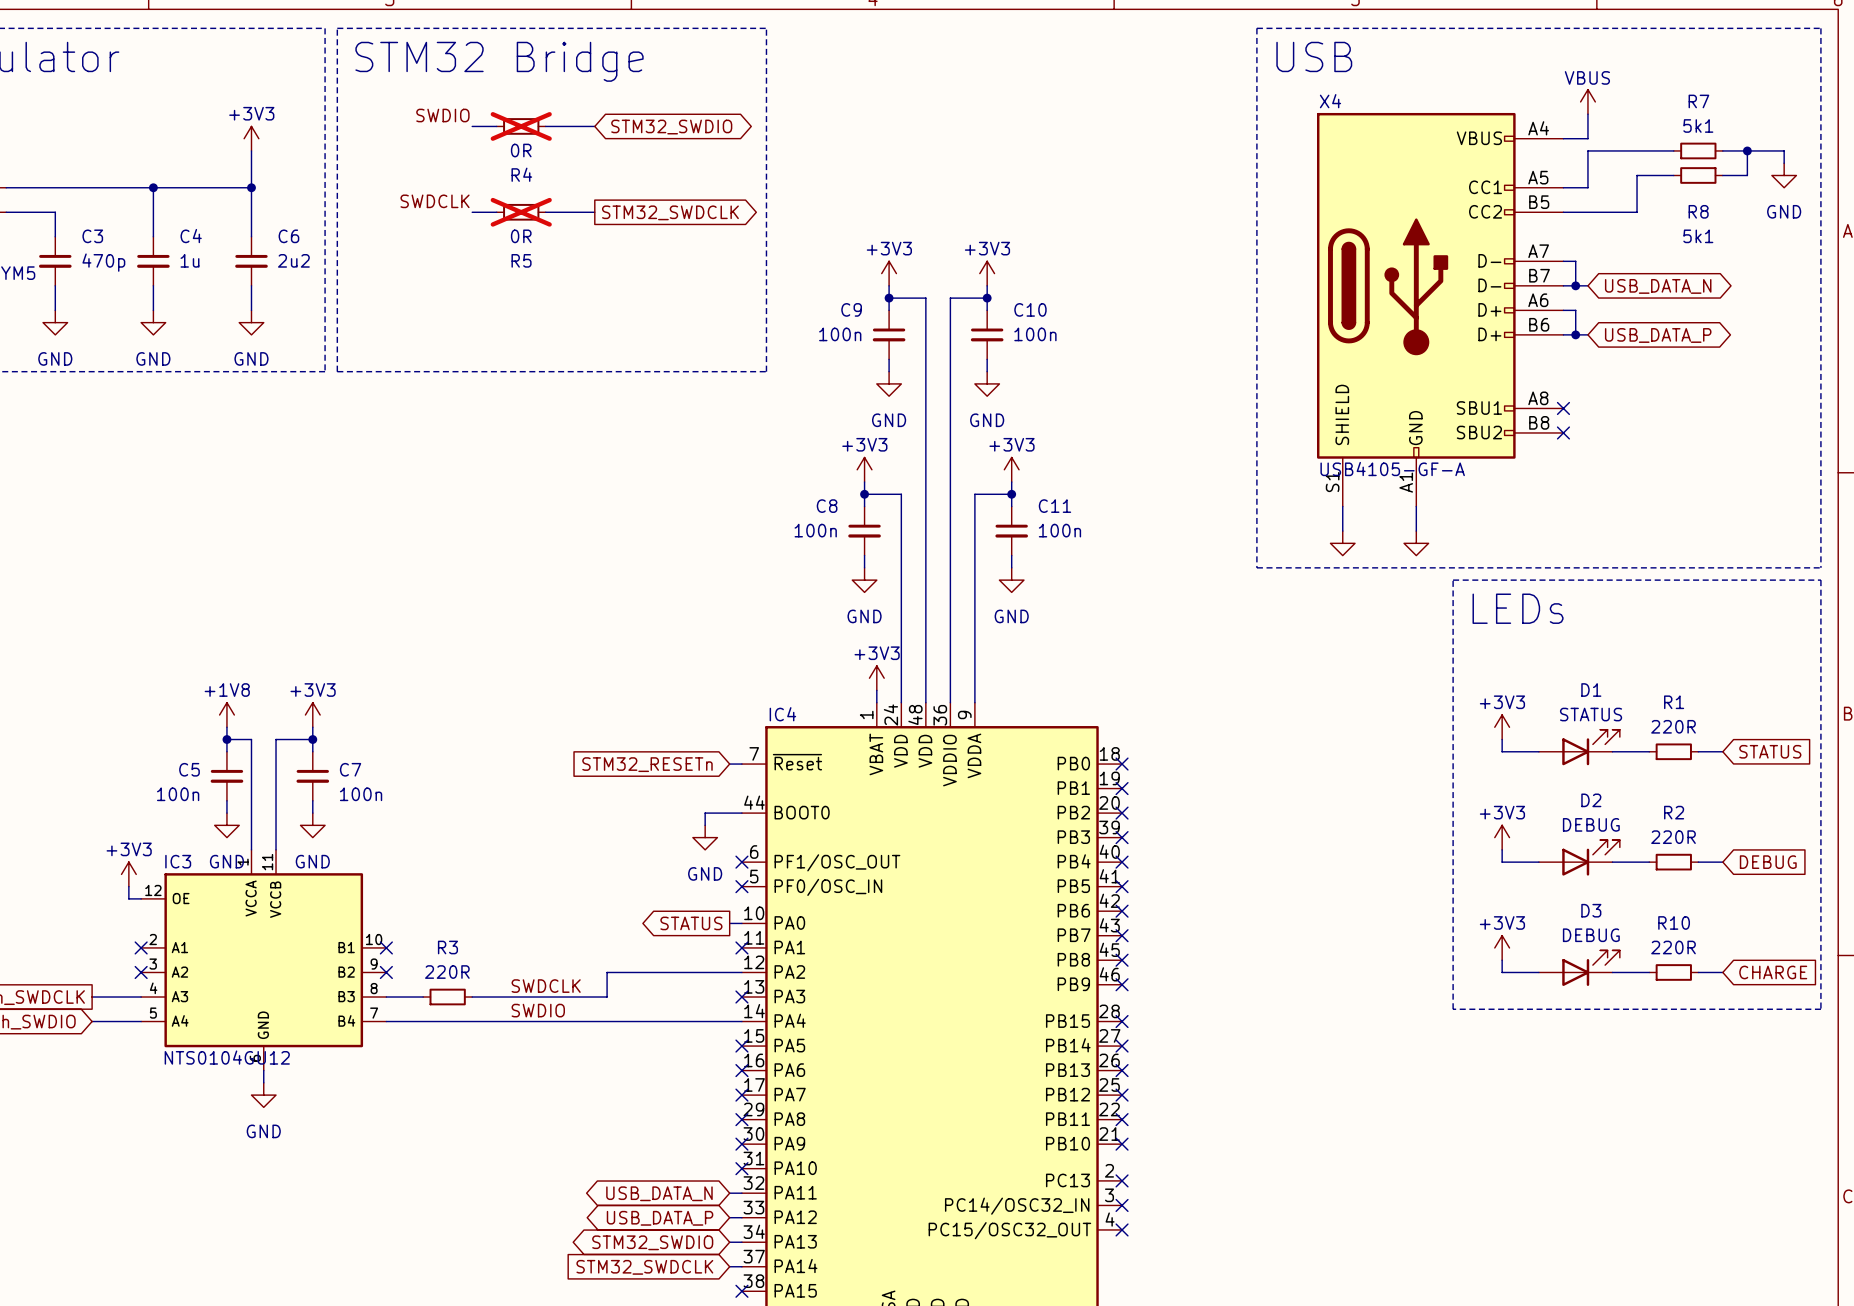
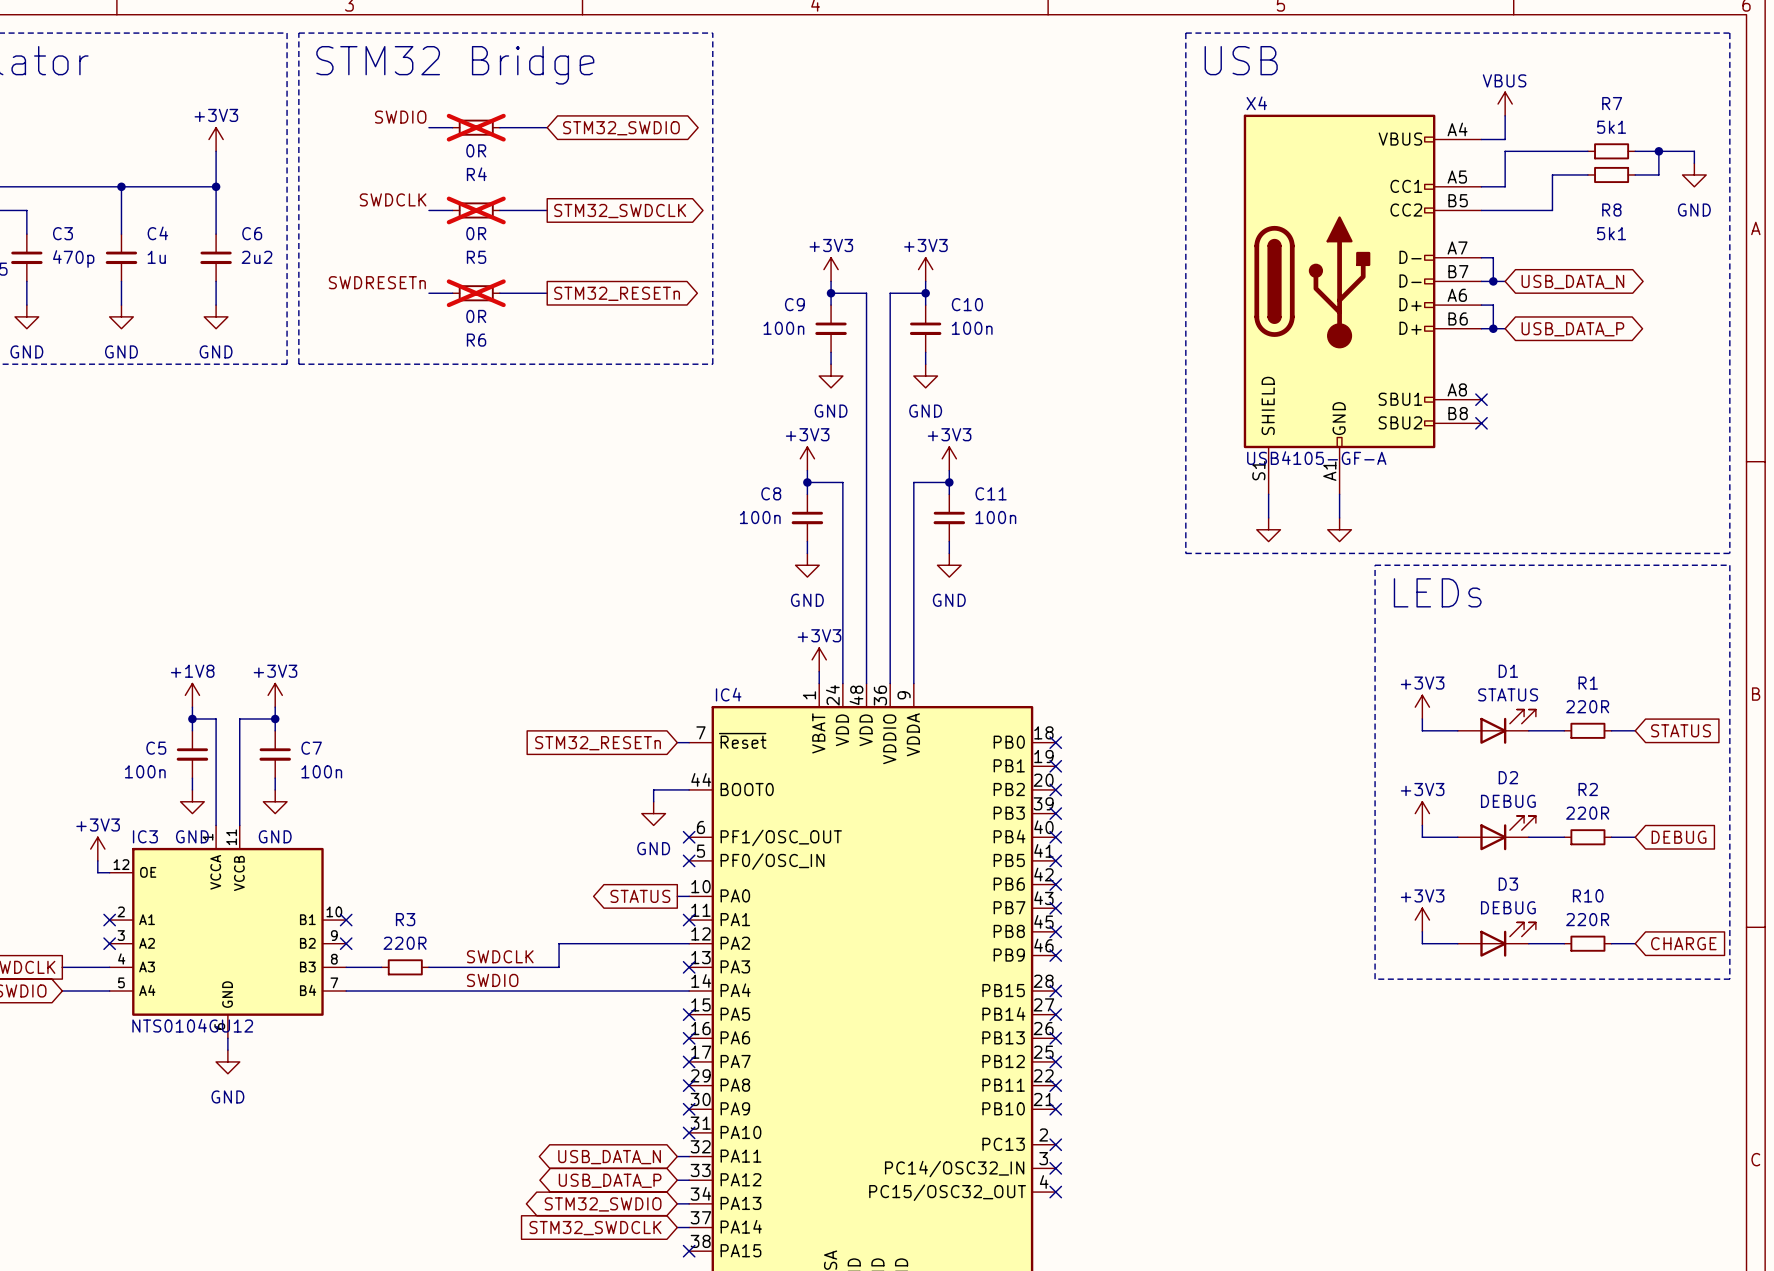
label: none -> SWDRESETn (377, 282)
wire: none -> (428, 293) (452, 293)
R6: none -> 0R (476, 293)
wire: none -> (499, 293) (547, 293)
global label: none -> STM32_RESETn (617, 293)

